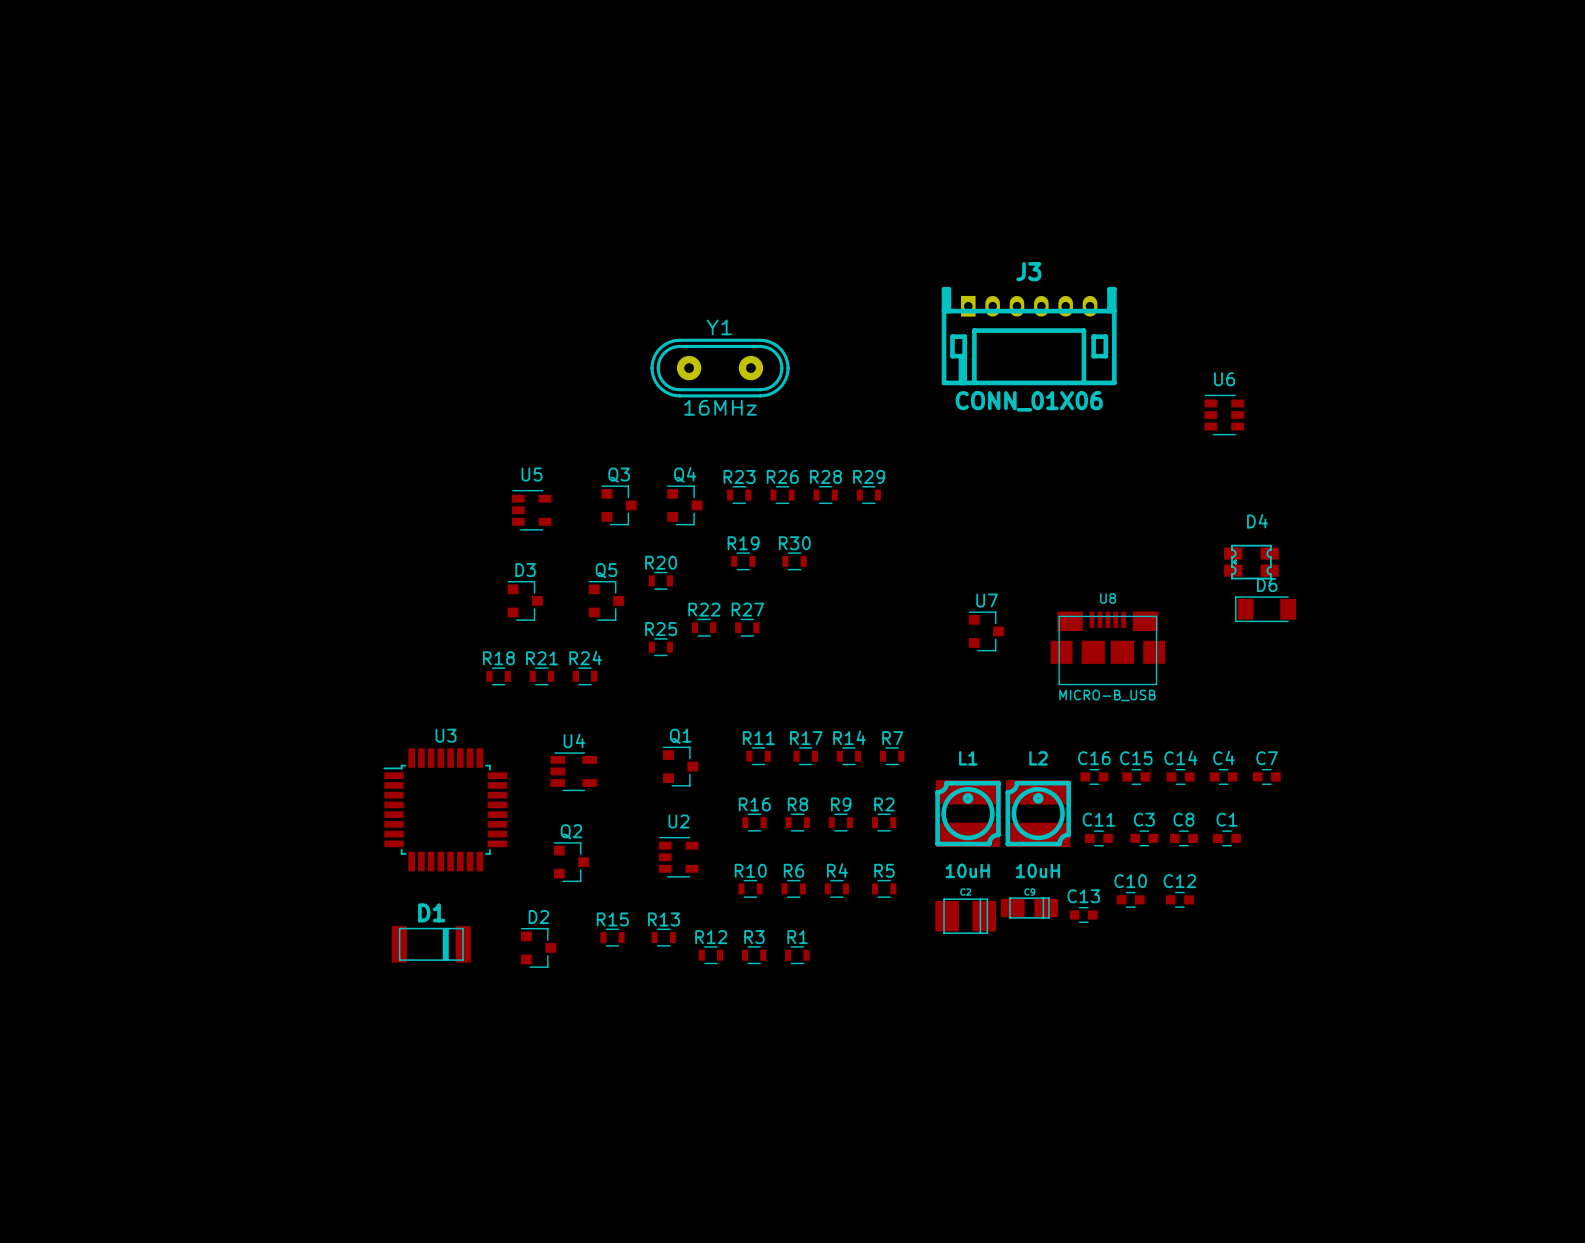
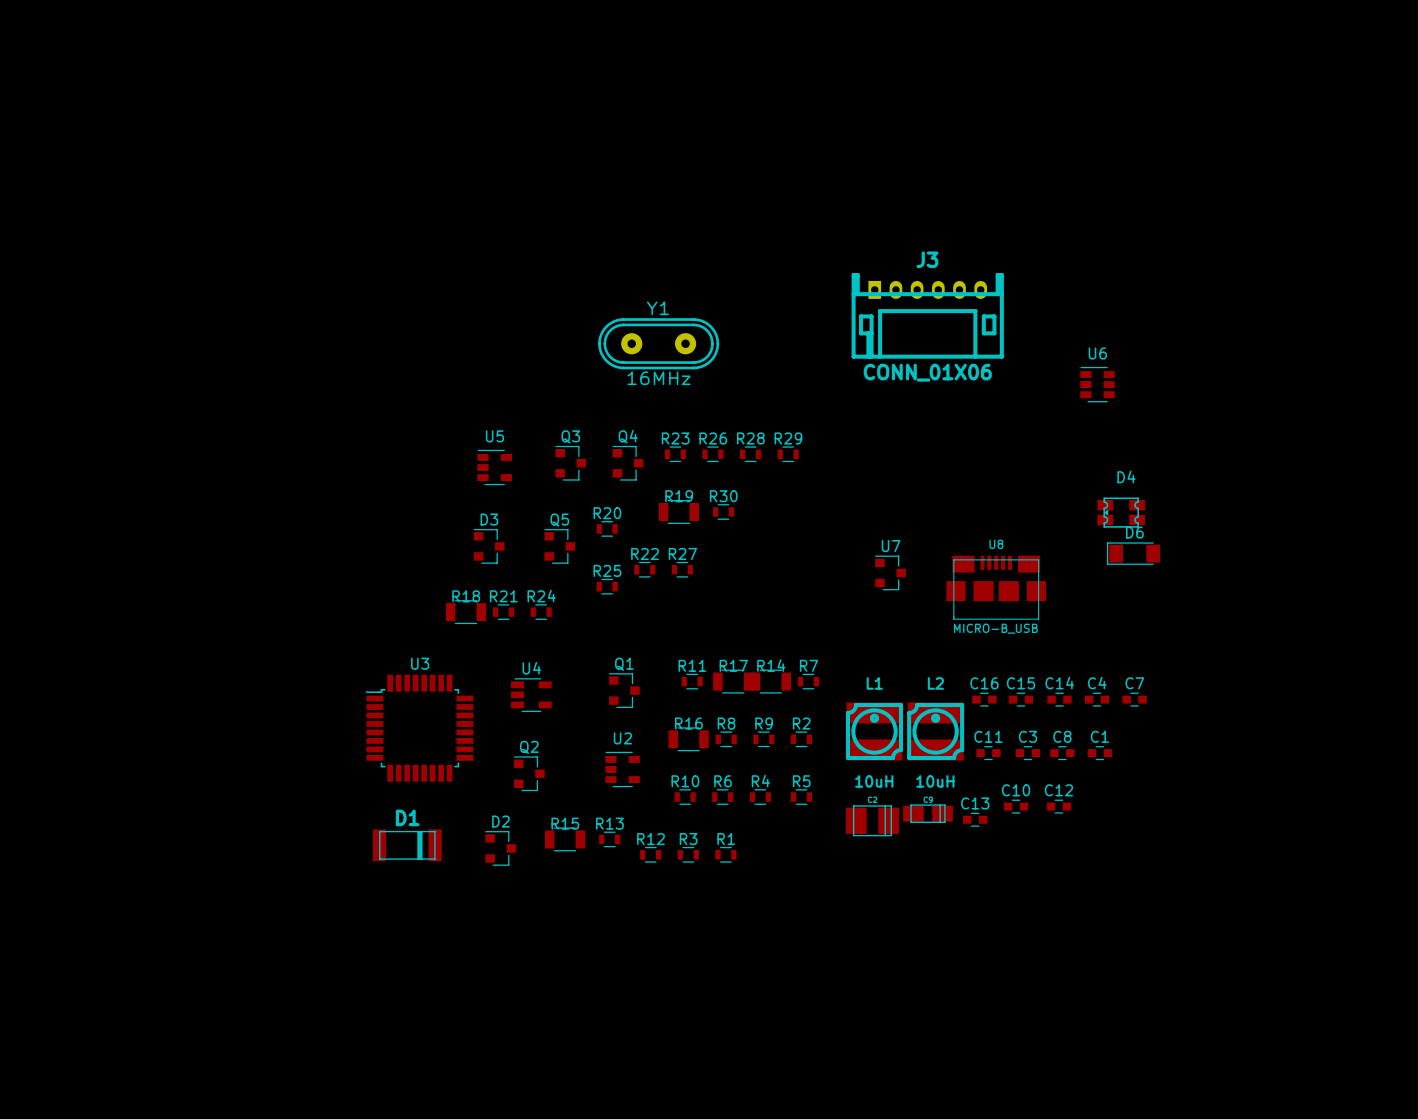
R19 footprint: [731, 552, 756, 571] -> [658, 500, 700, 524]
R18 footprint: [486, 667, 511, 686] -> [445, 600, 487, 625]
R17 footprint: [793, 747, 818, 766] -> [713, 669, 754, 694]
R14 footprint: [836, 747, 862, 766] -> [750, 669, 791, 694]
R16 footprint: [742, 813, 767, 832] -> [668, 727, 709, 752]
R15 footprint: [600, 928, 625, 947] -> [544, 827, 586, 852]

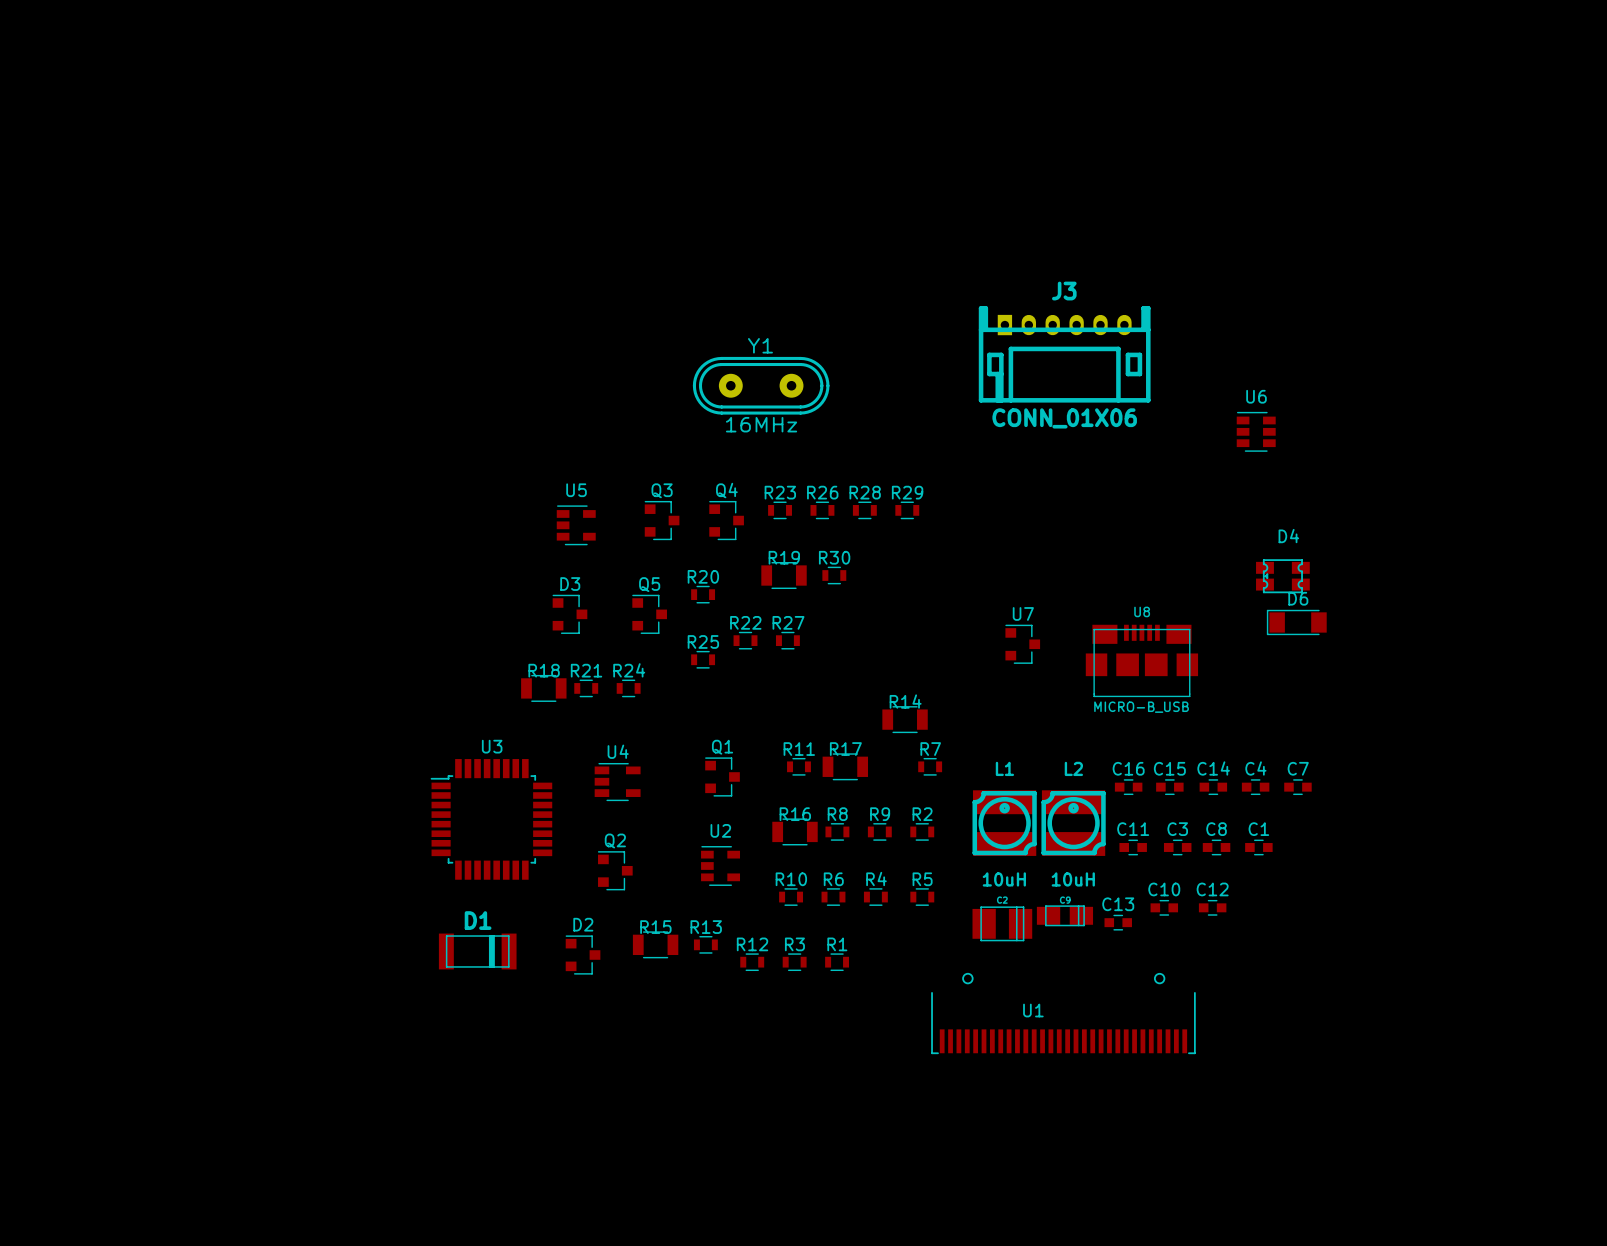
R14 position: (770, 681) -> (905, 719)
U1: none -> (1063, 1013)

